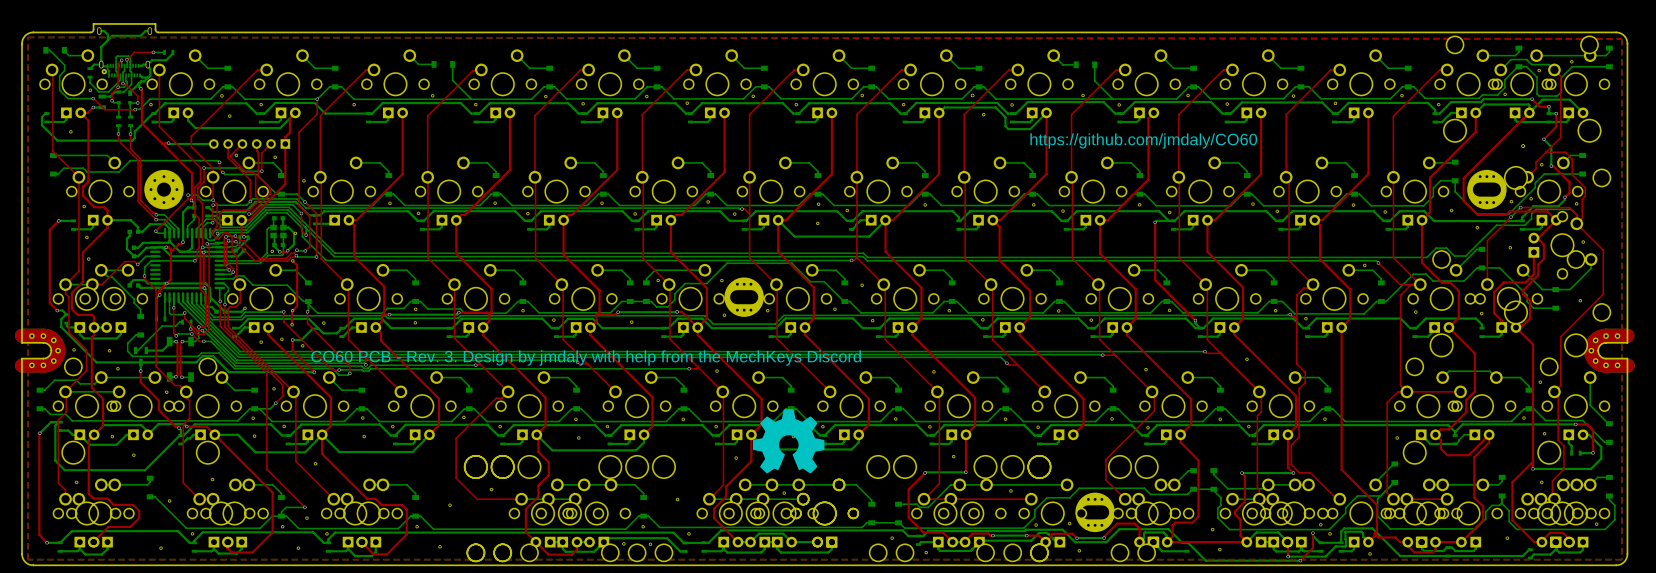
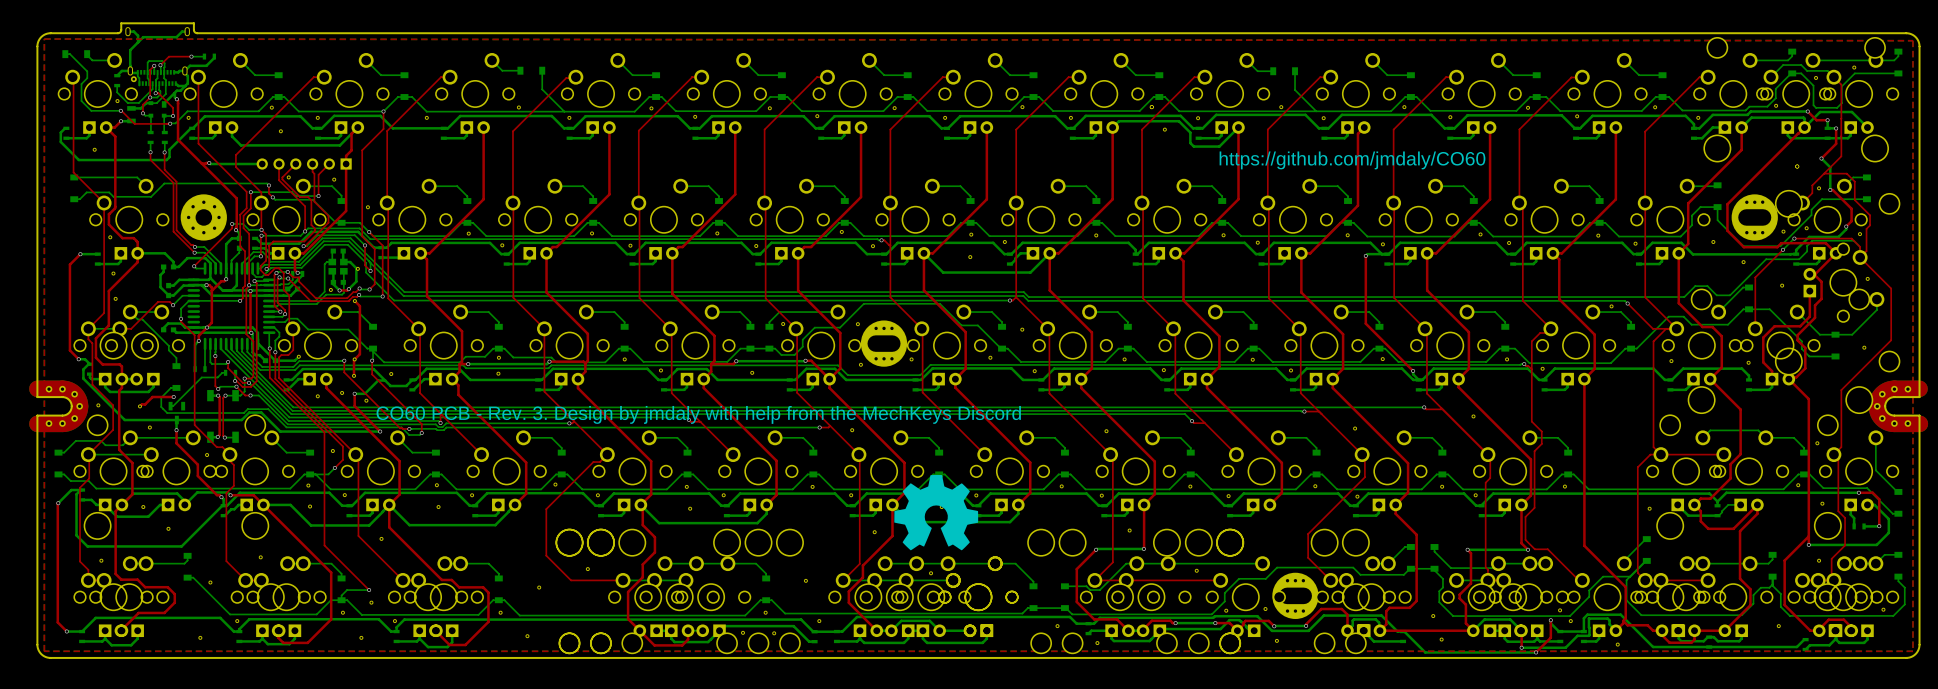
bottom track: (169, 341) (162, 350) (146, 350) -> none
top track: none -> (173, 397) (152, 397) (145, 404) (139, 406)
via: none -> (173, 397)

